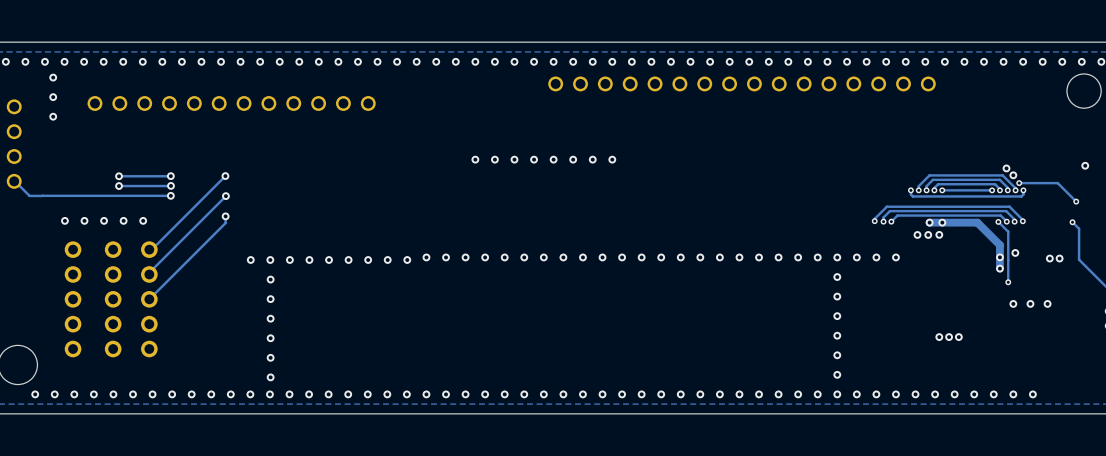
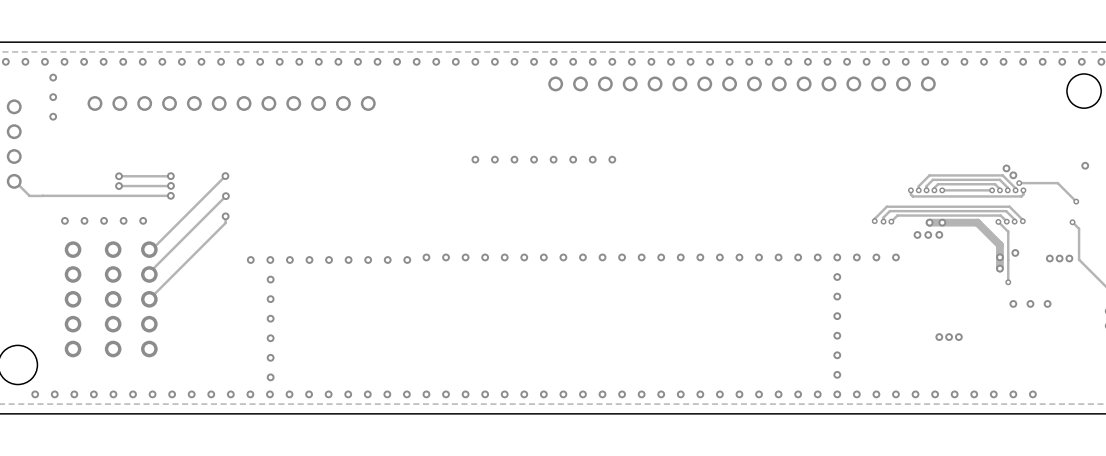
via: none -> (1069, 258)

